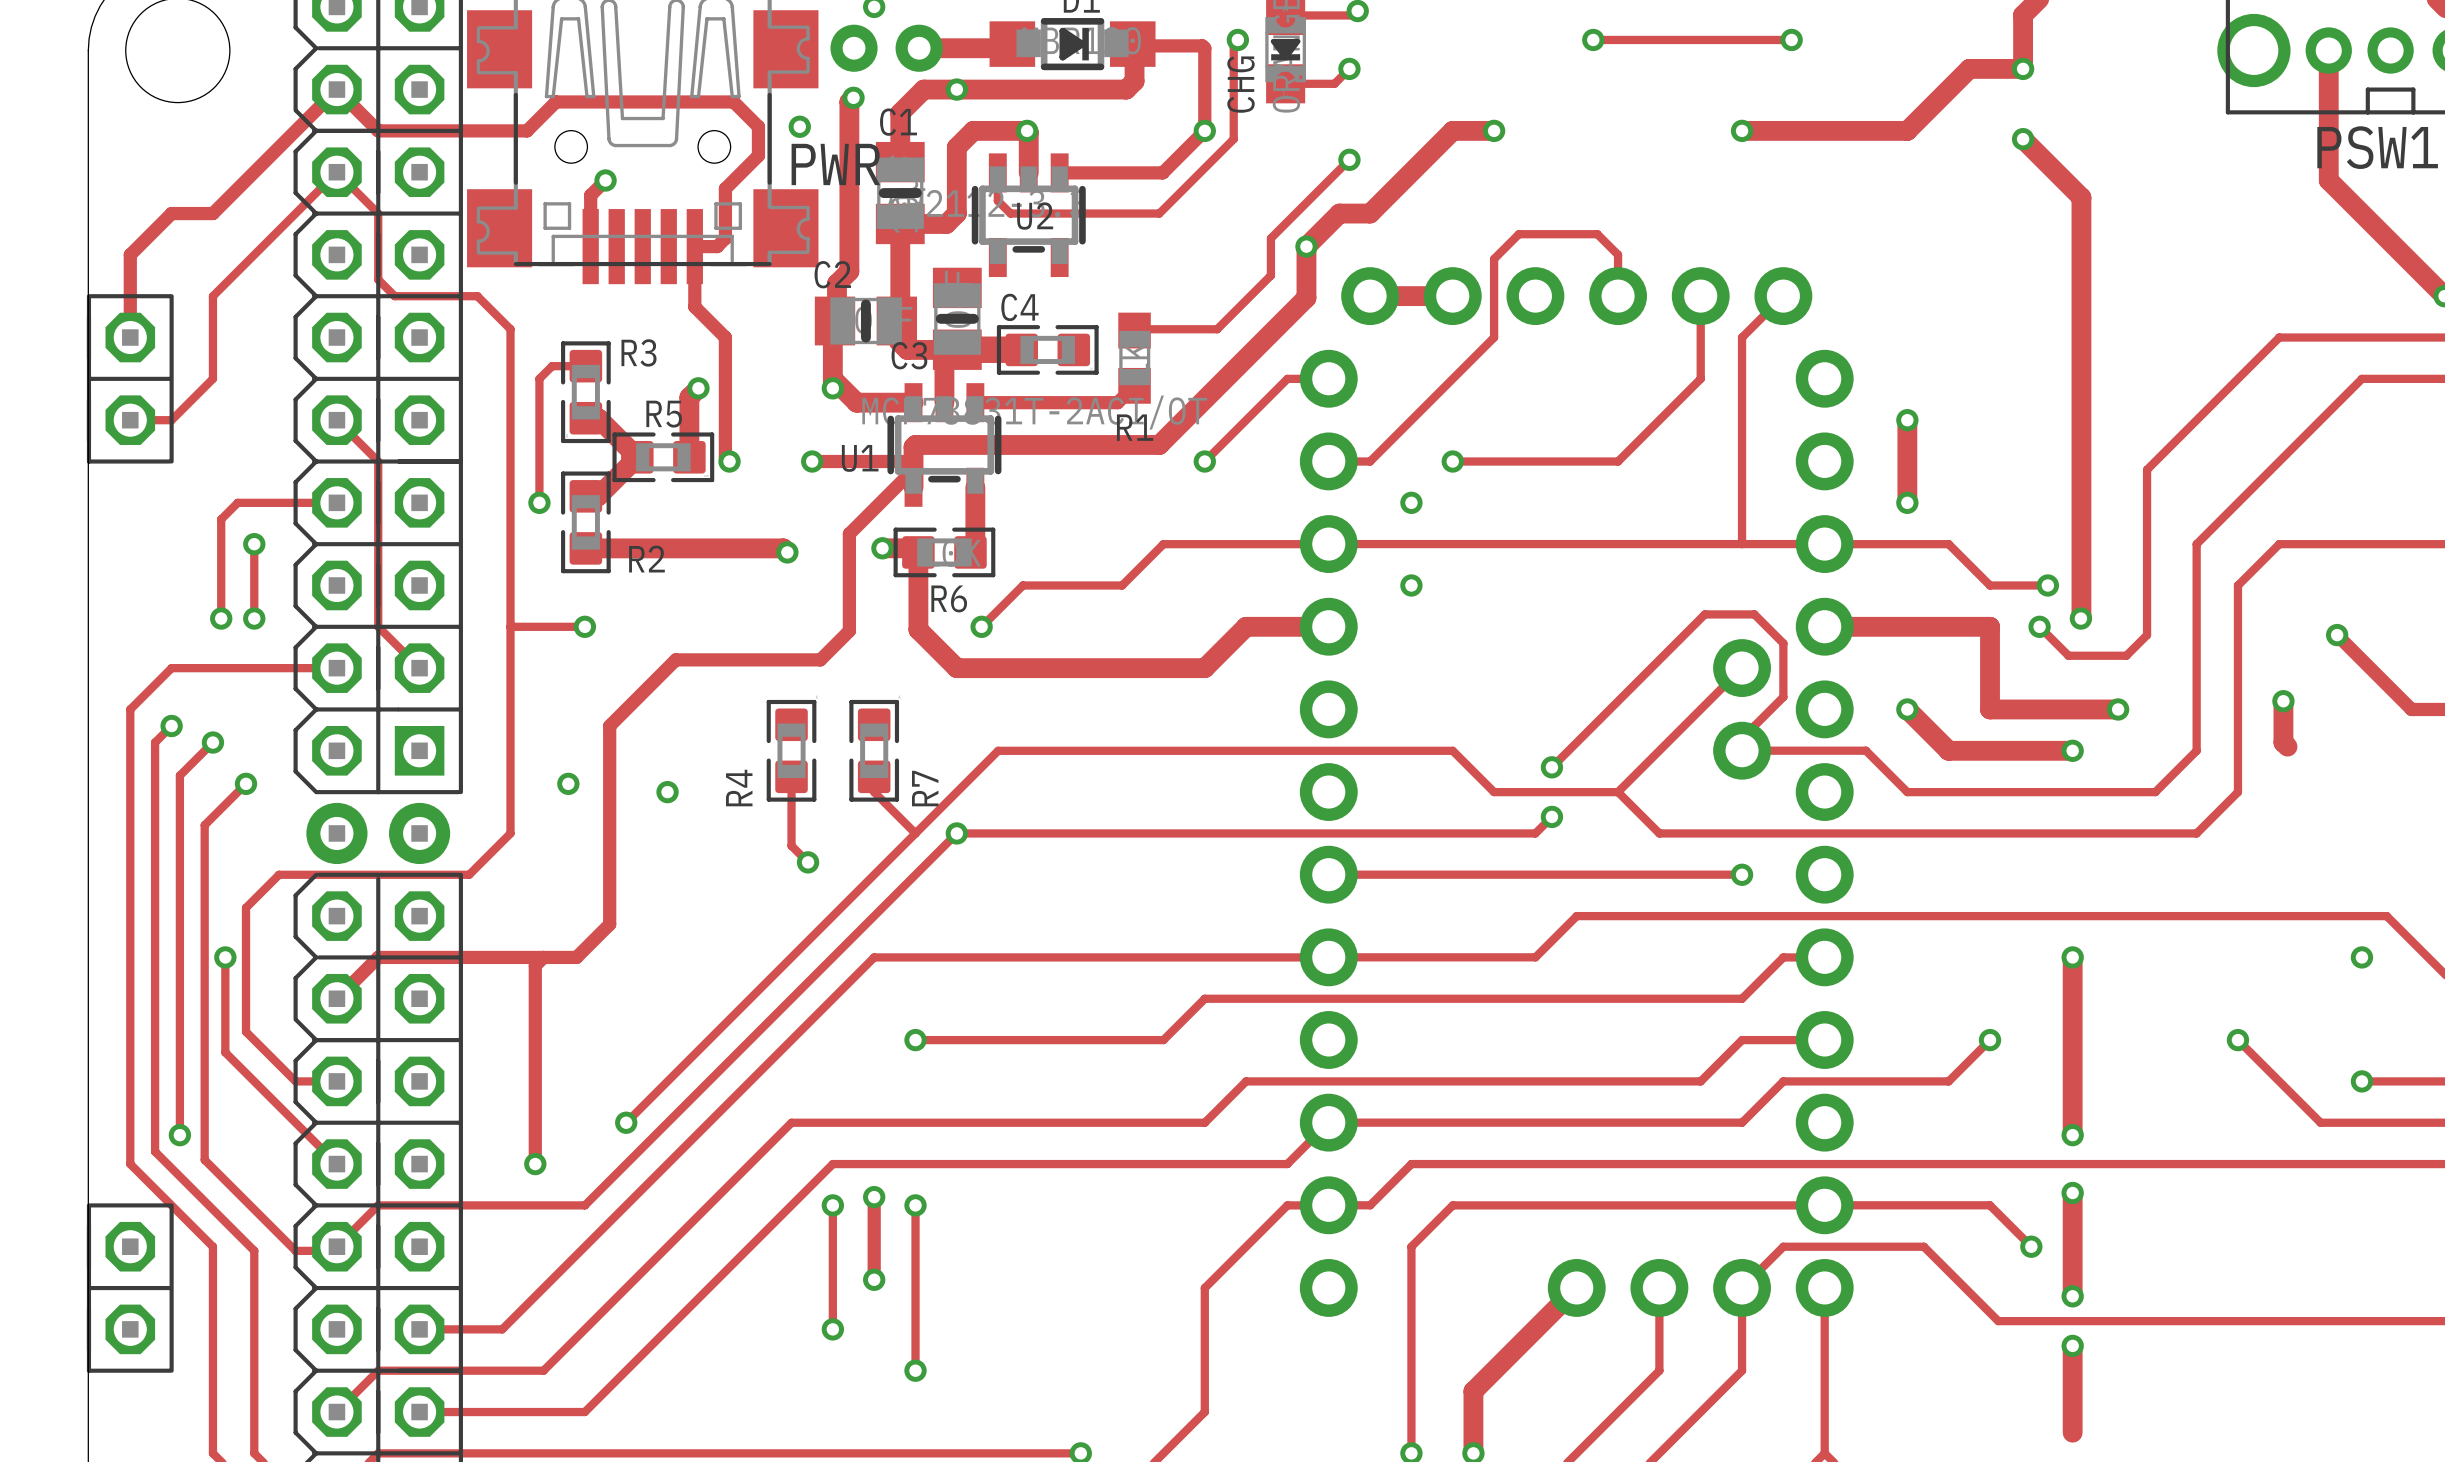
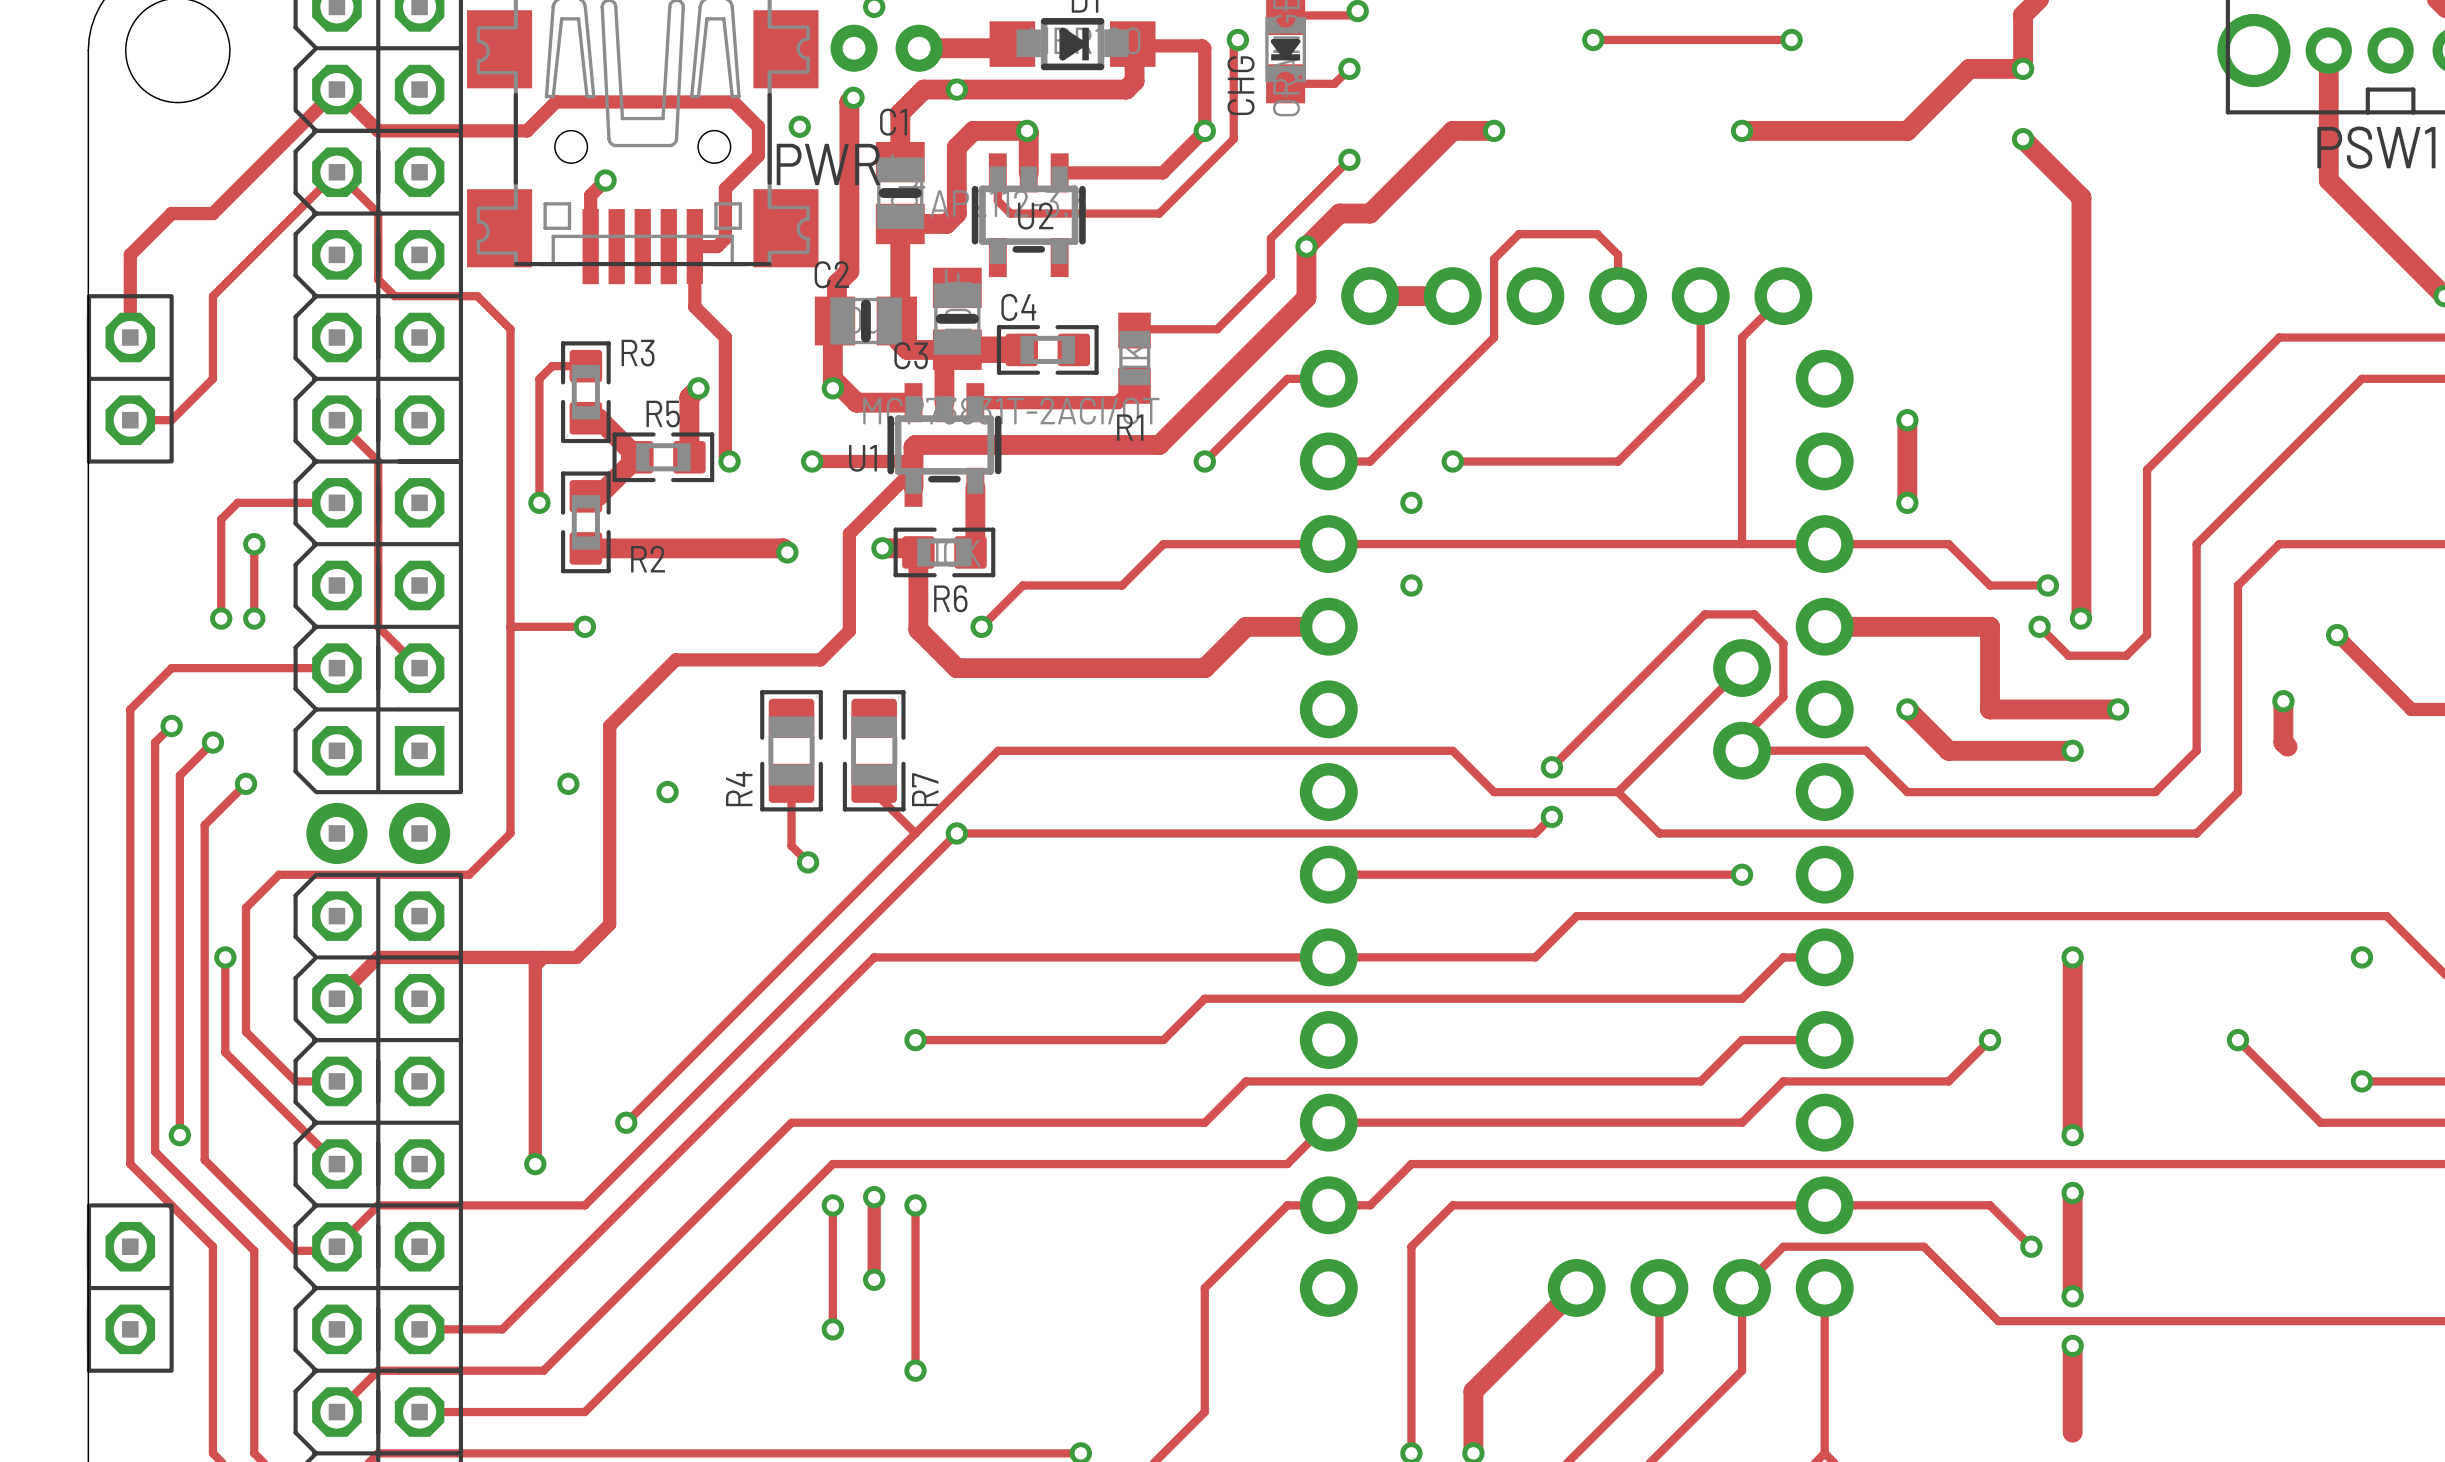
R4 footprint: [766, 699, 817, 802] -> [760, 690, 823, 812]
R7 footprint: [849, 699, 900, 802] -> [842, 690, 906, 812]

